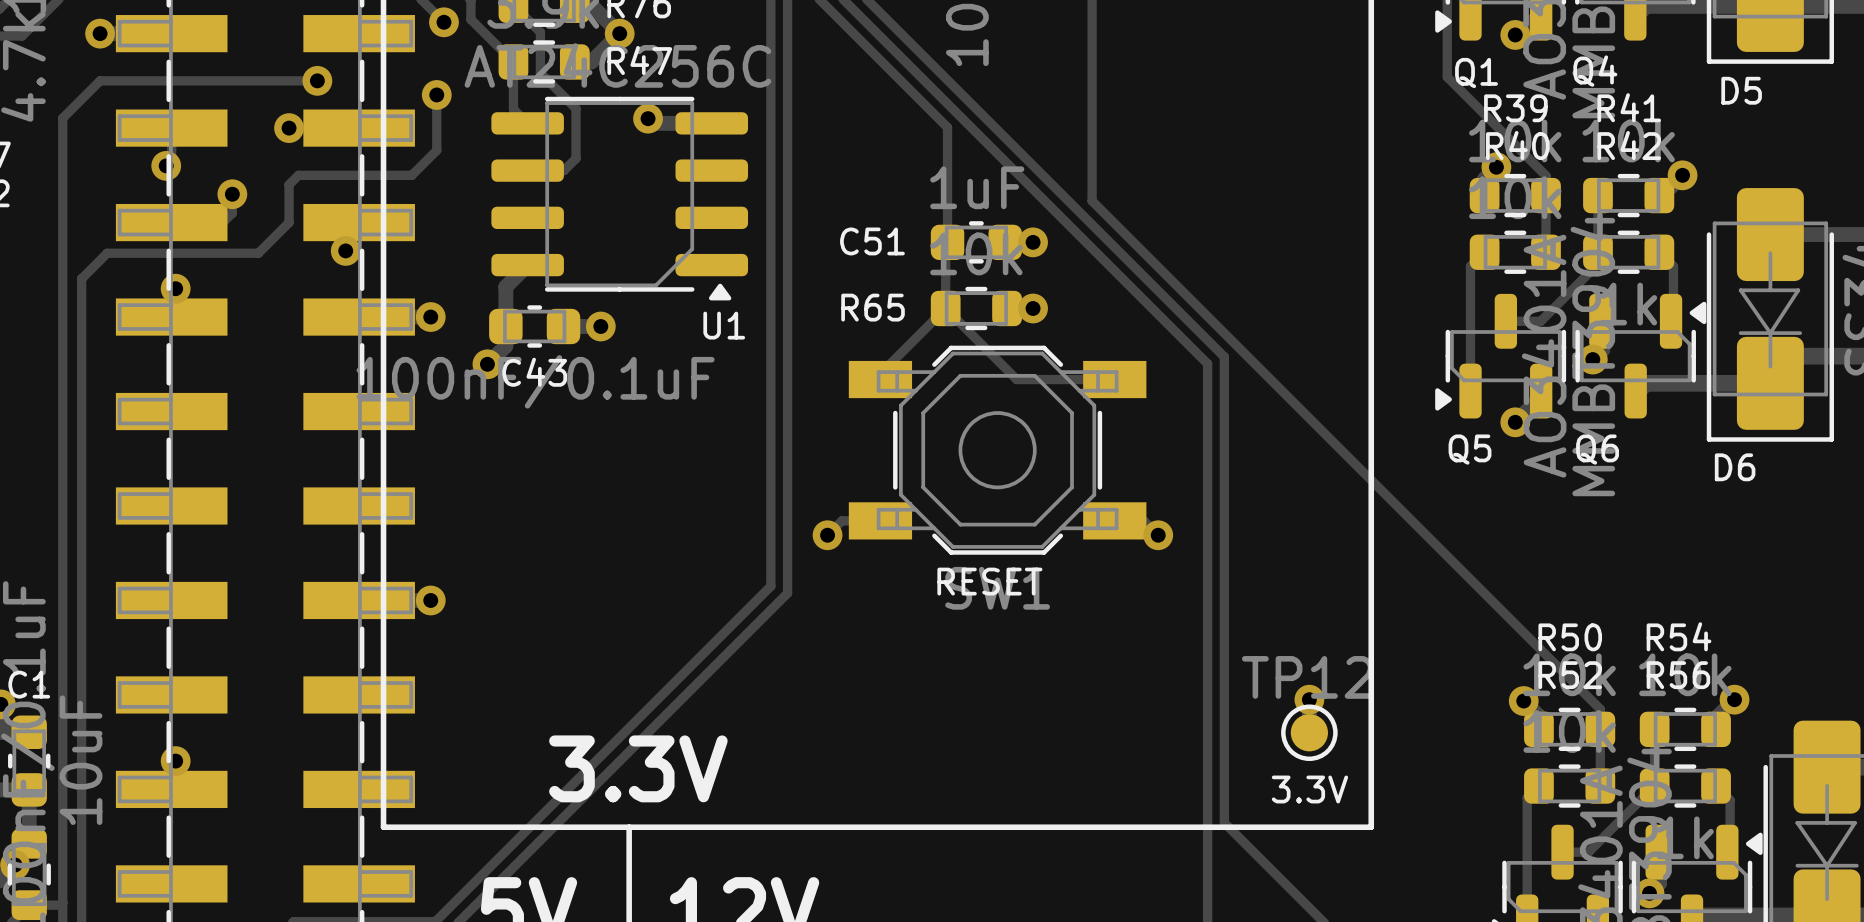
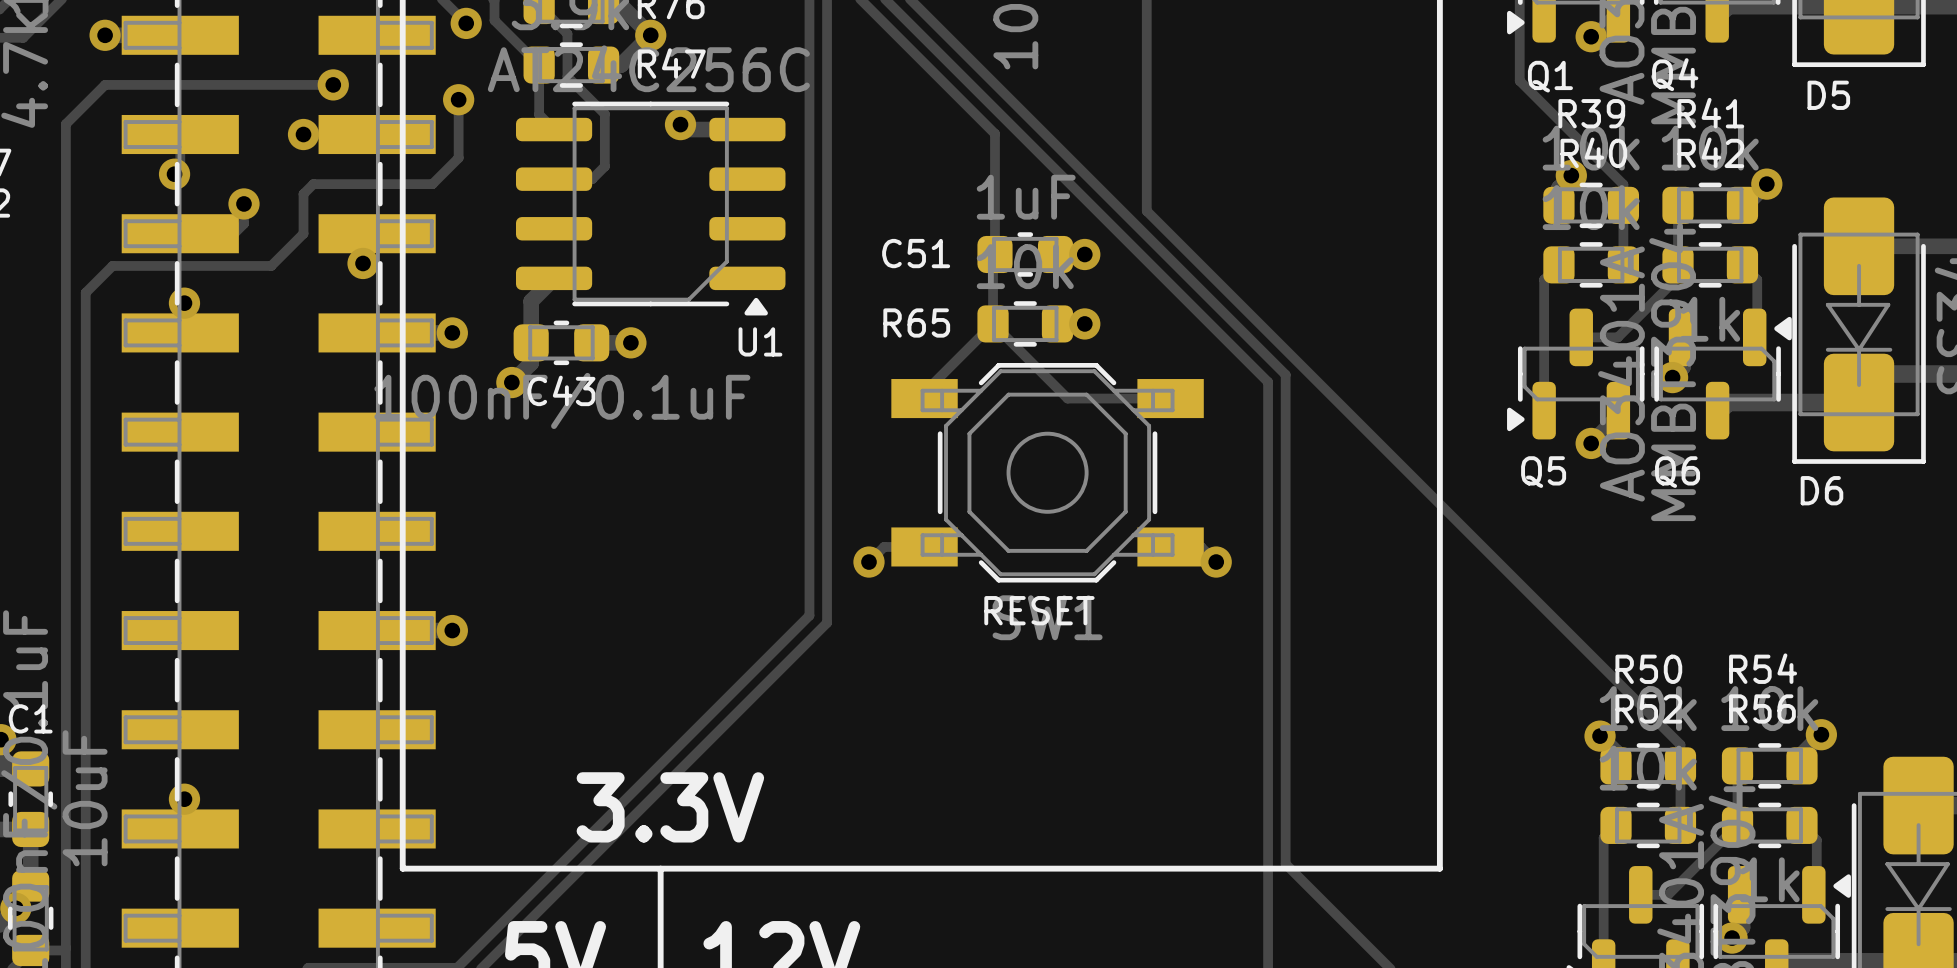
via: (1309, 699) -> none
TP12: 3.3V (1309, 732) -> none

